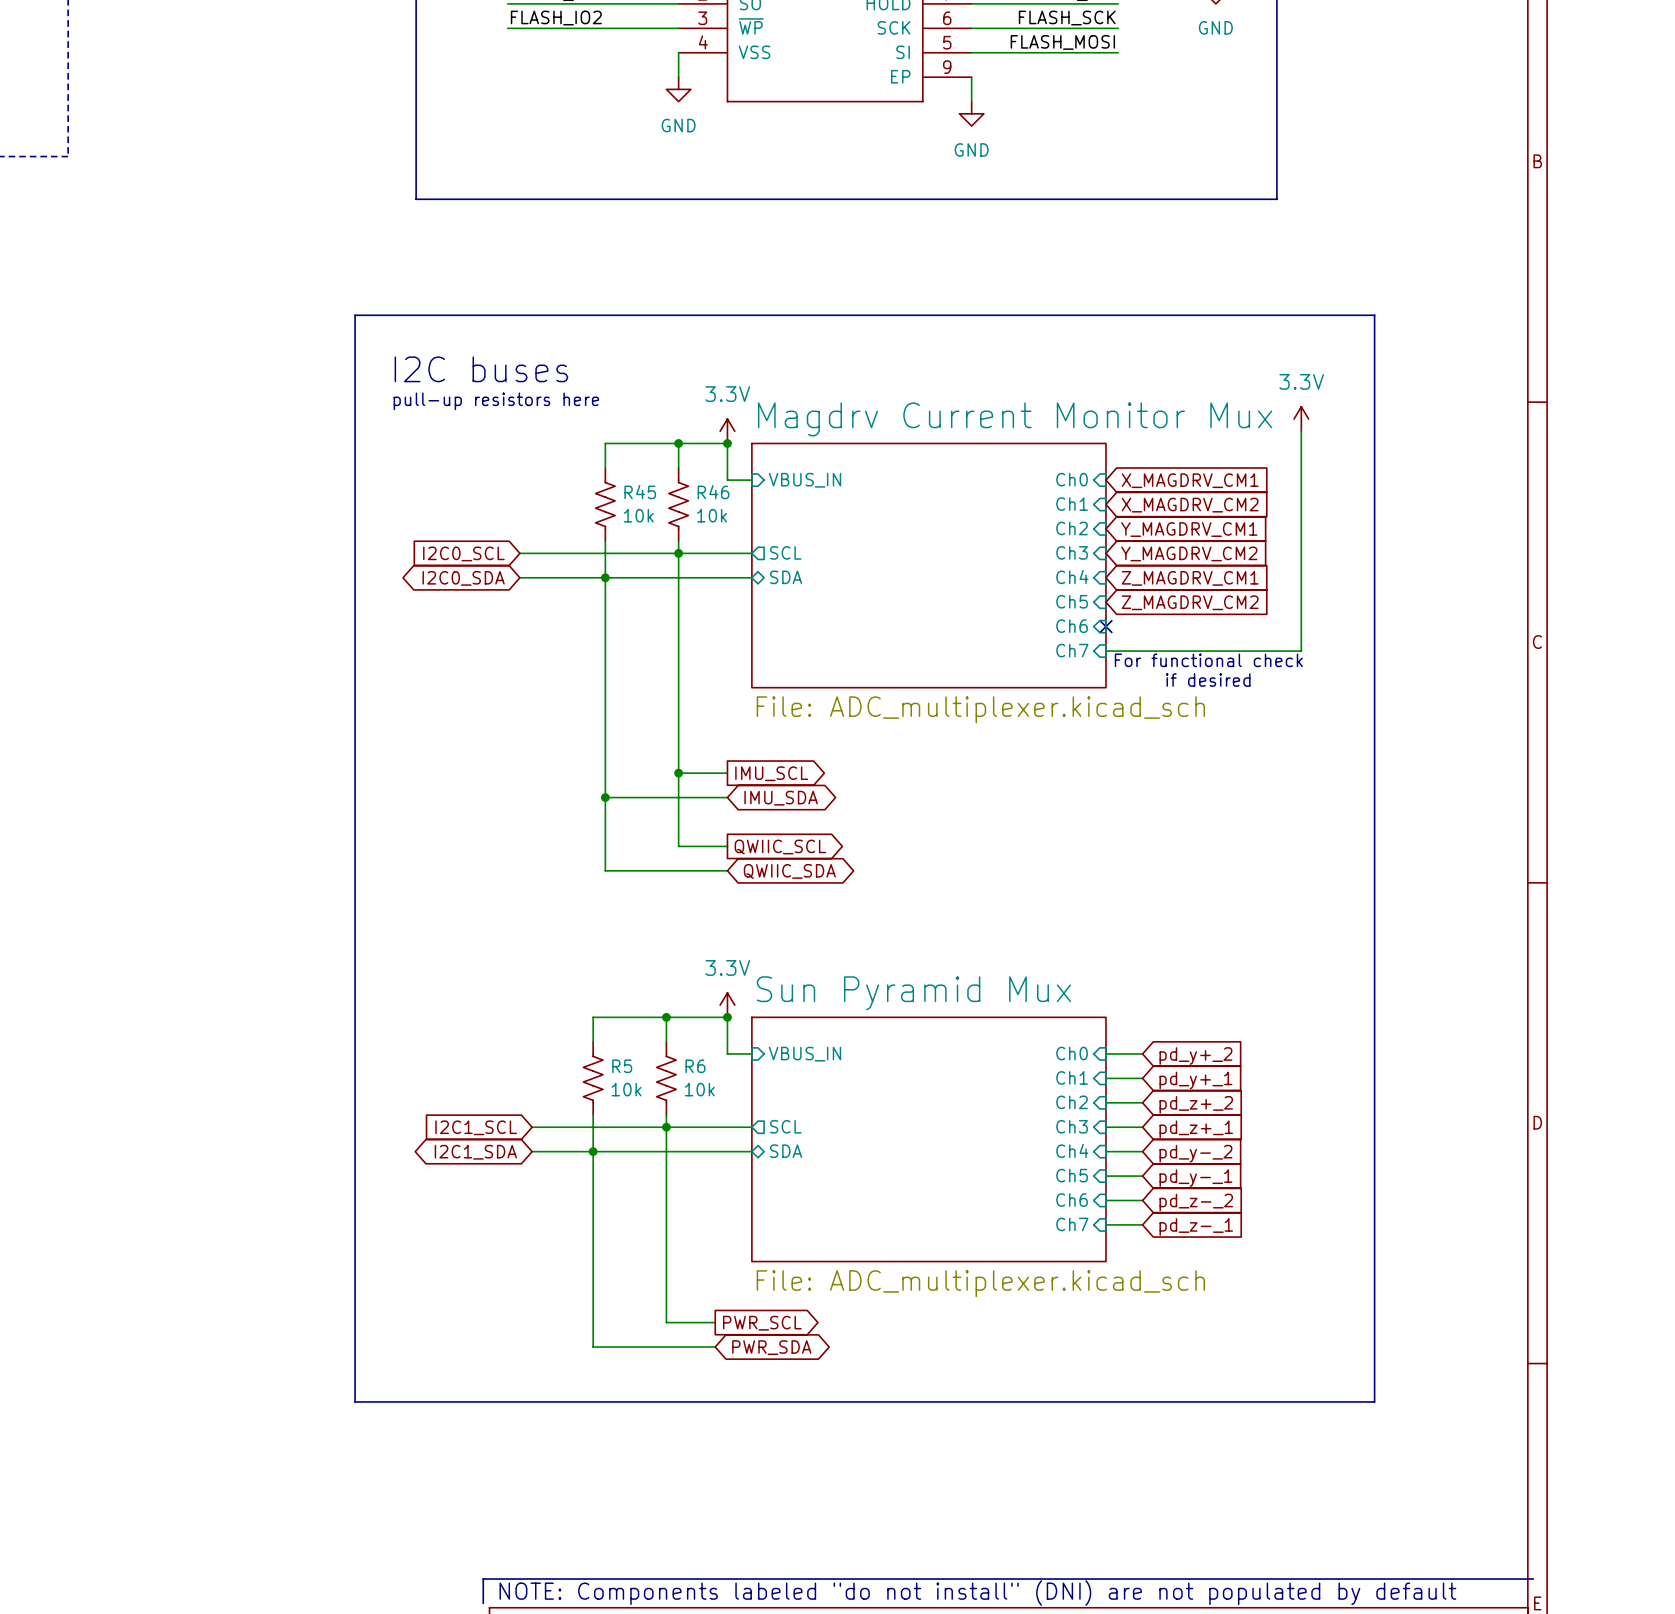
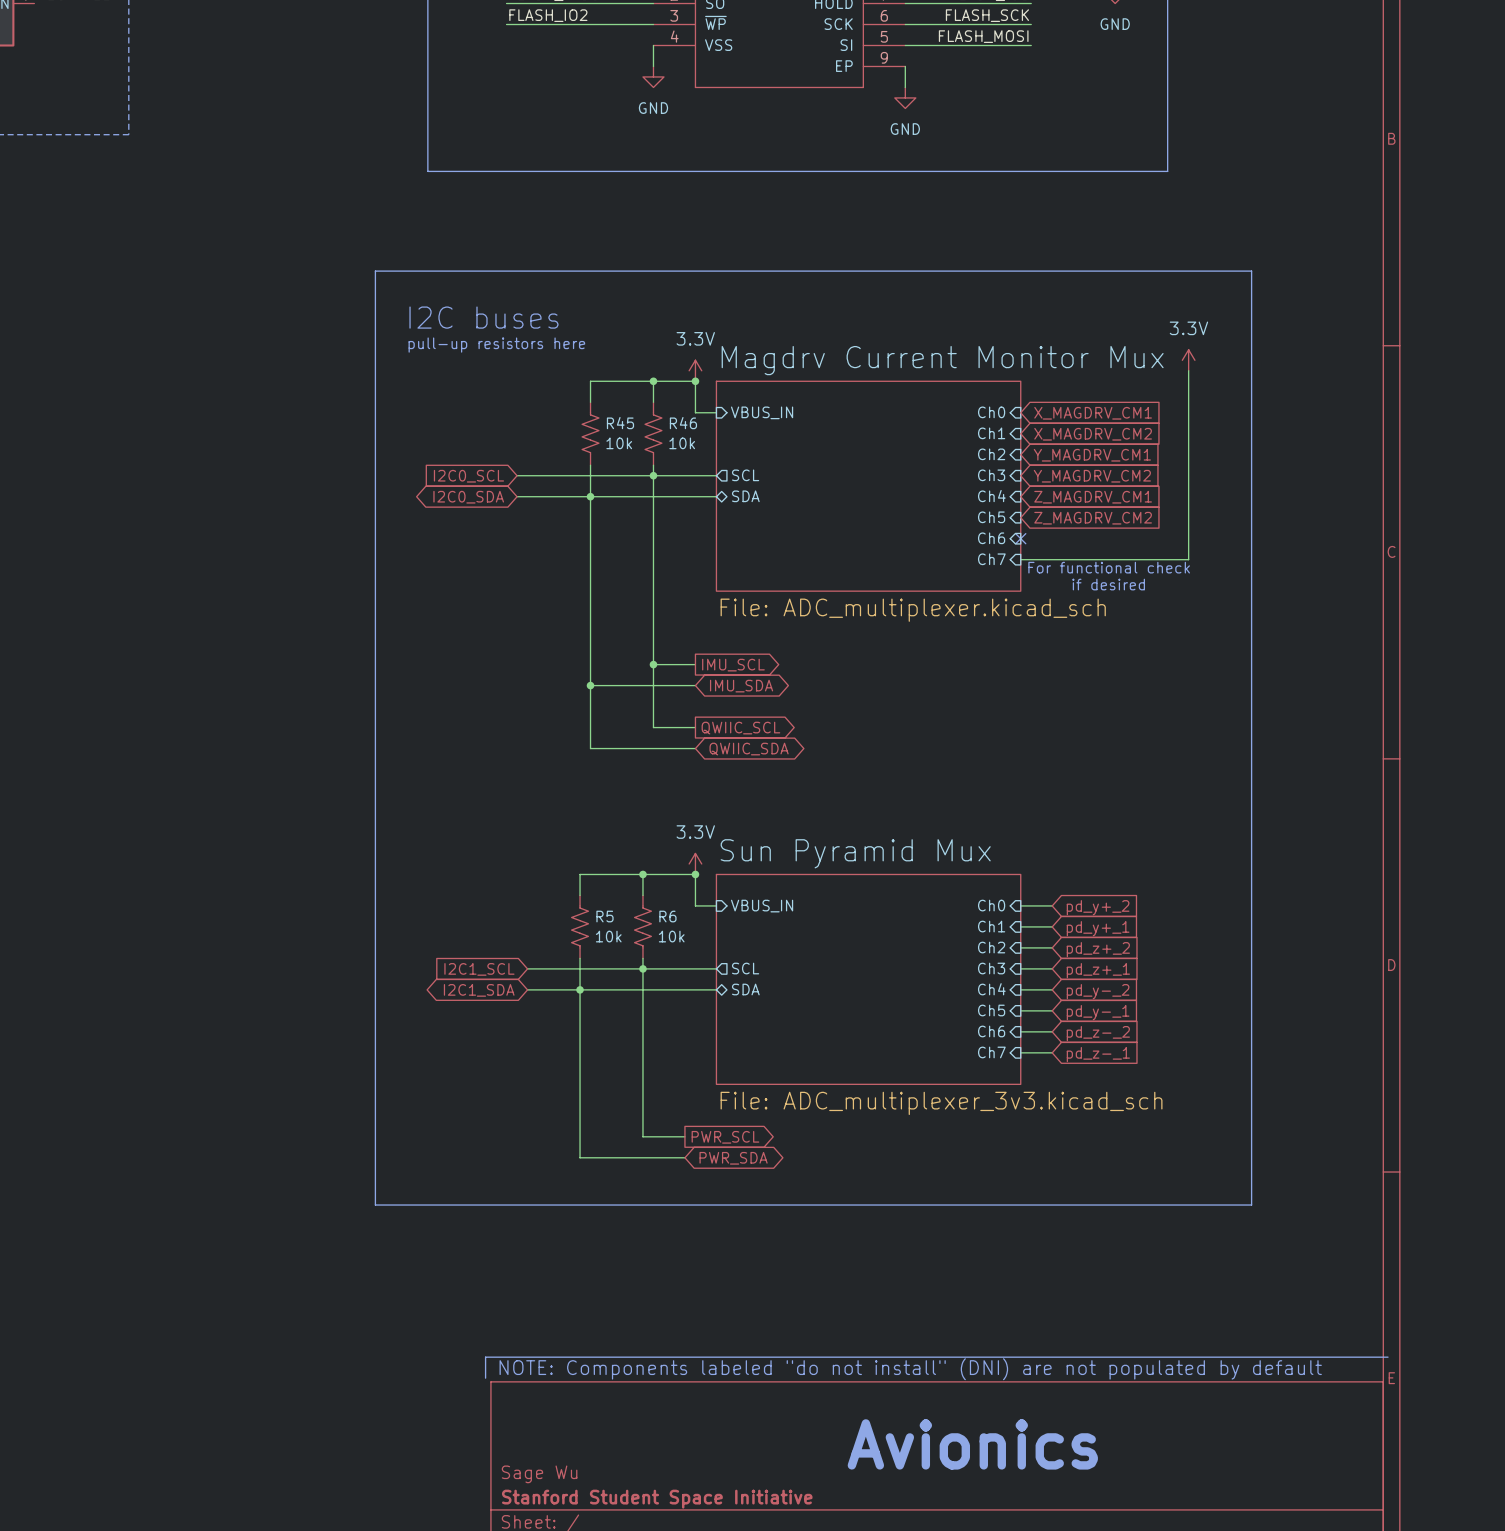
sheet Sun Pyramid Mux value: File: ADC_multiplexer.kicad_sch (980, 1283) -> File: ADC_multiplexer_3v3.kicad_sch (941, 1103)

